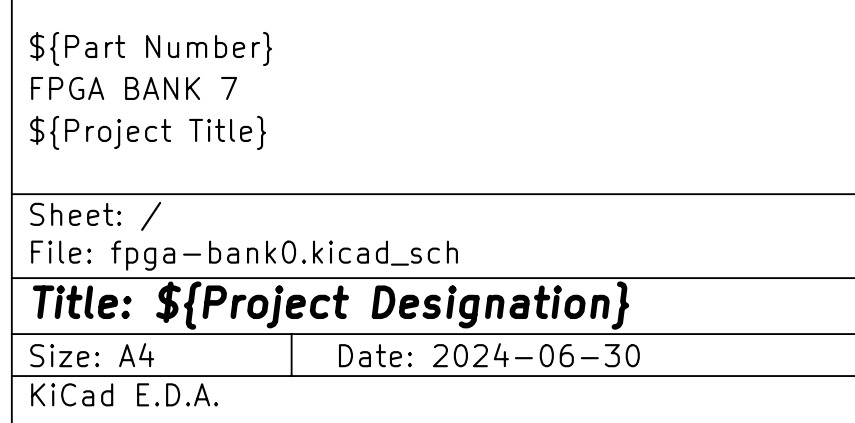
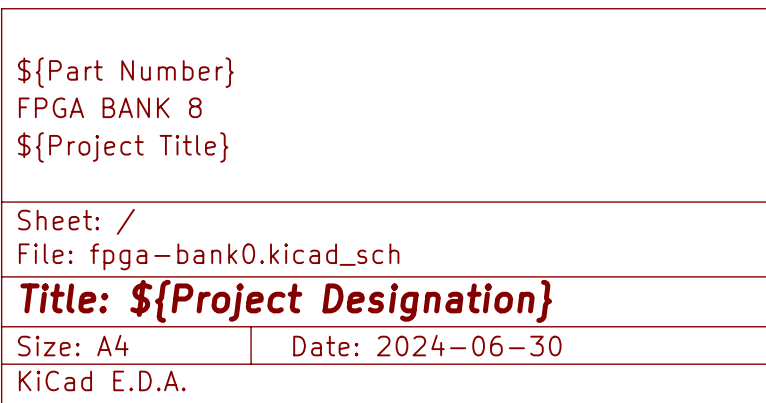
title block: FPGA BANK 7 (134, 88) -> FPGA BANK 8 (110, 107)

